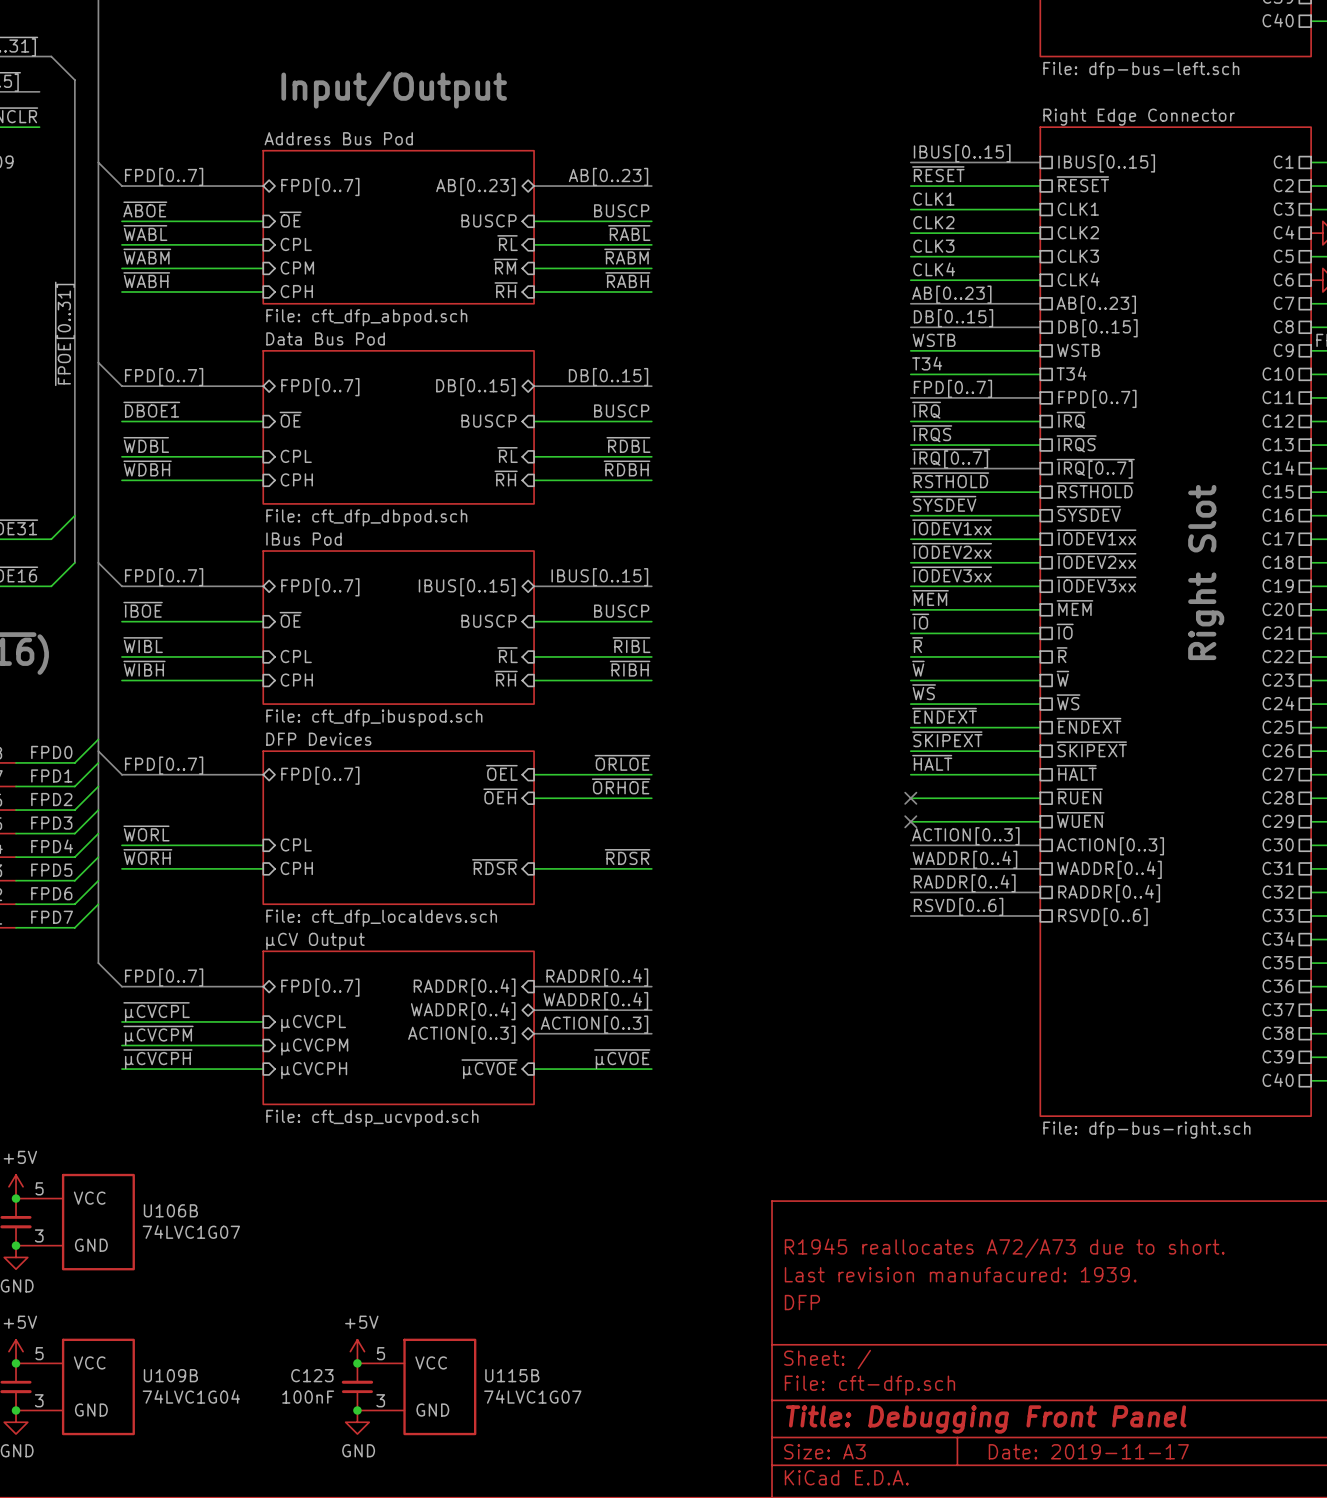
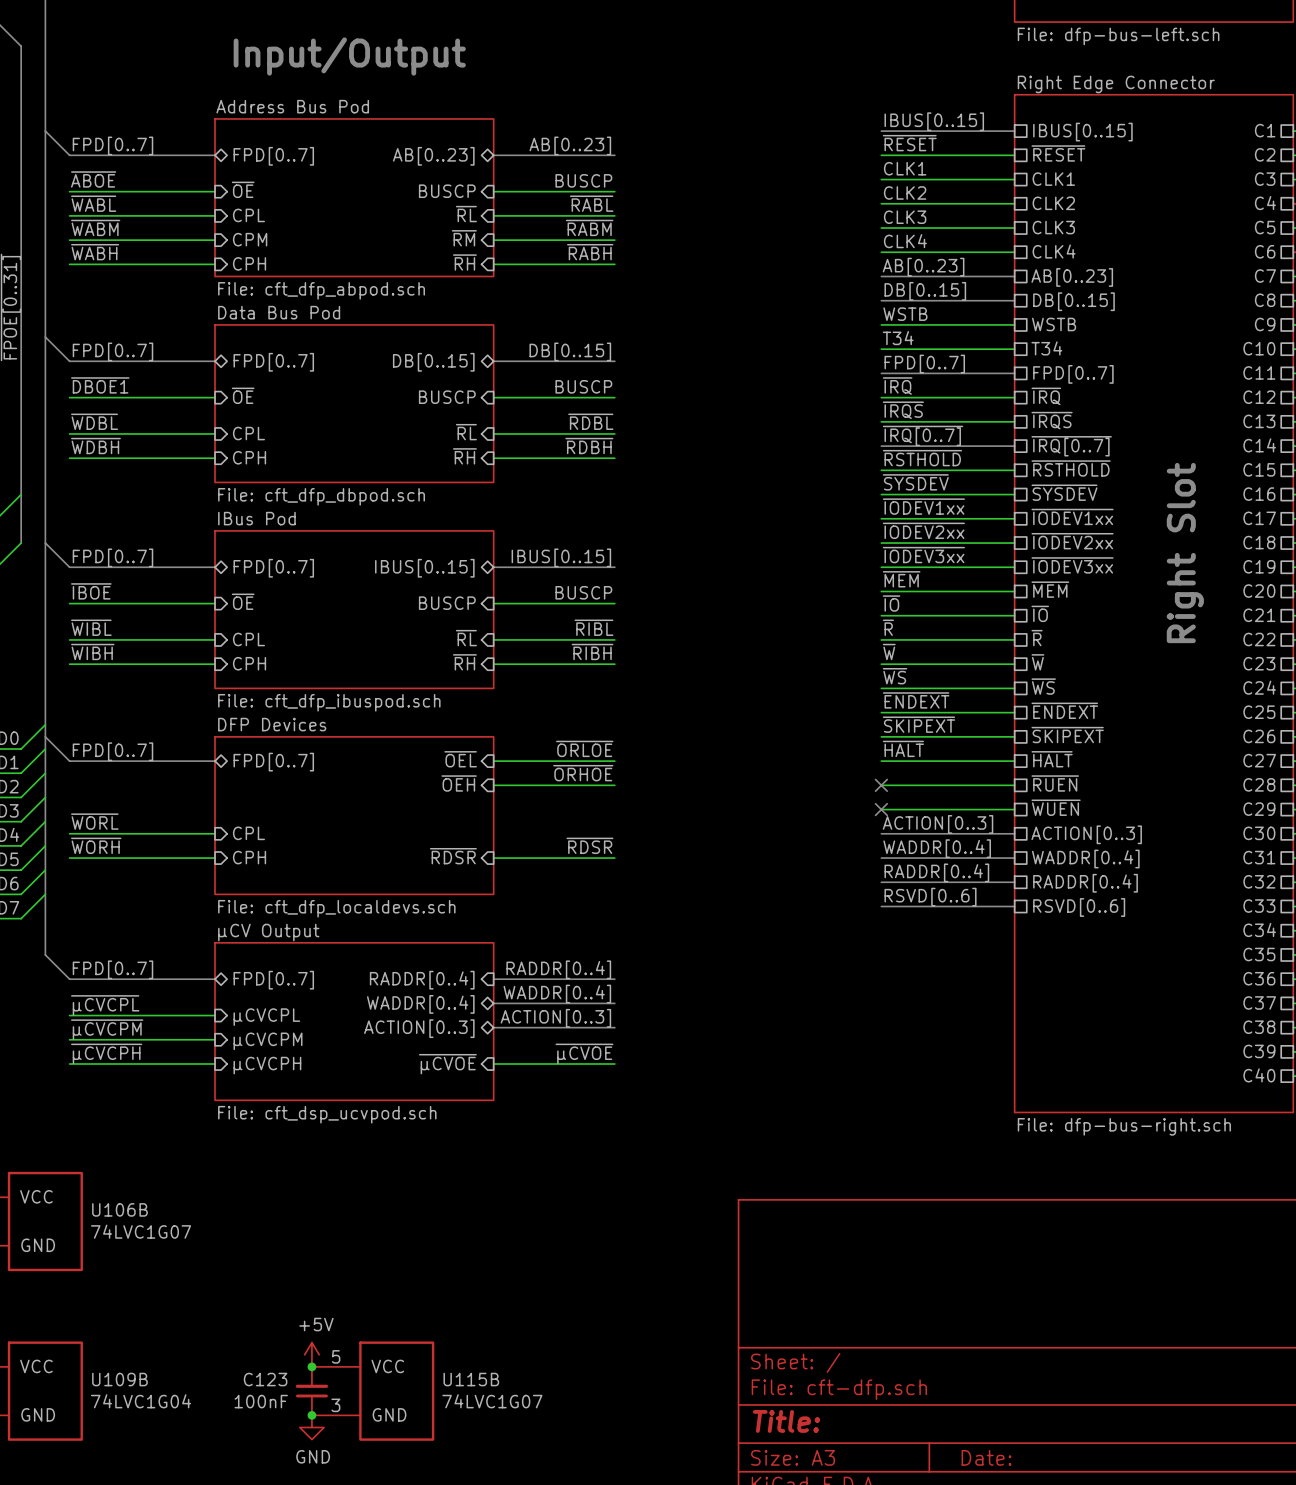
title block: R1945 reallocates A72/A73 due to short. (1004, 1248) -> none
title block: Last revision manufacured: 1939. (960, 1274) -> none
title block: DFP (802, 1302) -> none
title block: Title: Debugging Front Panel (986, 1419) -> Title: (786, 1421)
title block: Date: 2019-11-17 (1088, 1451) -> Date: (986, 1457)

